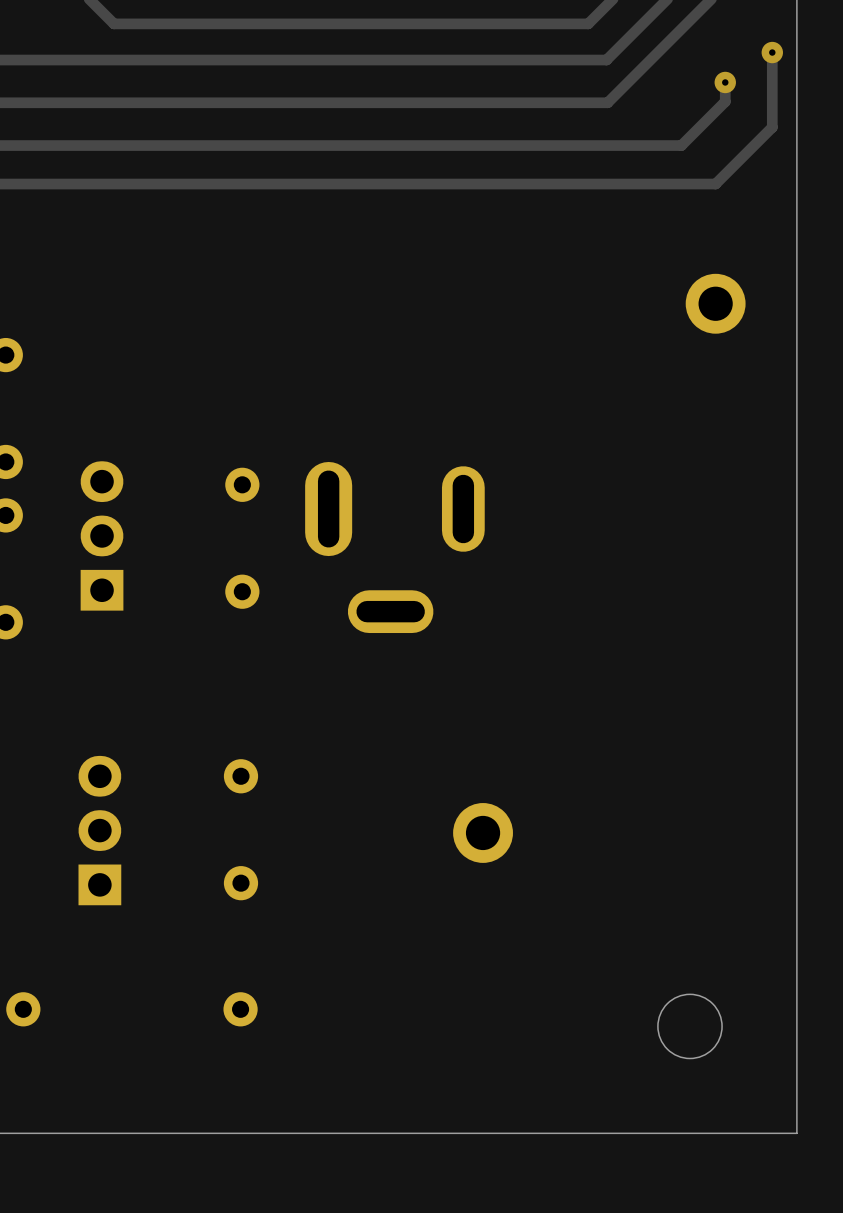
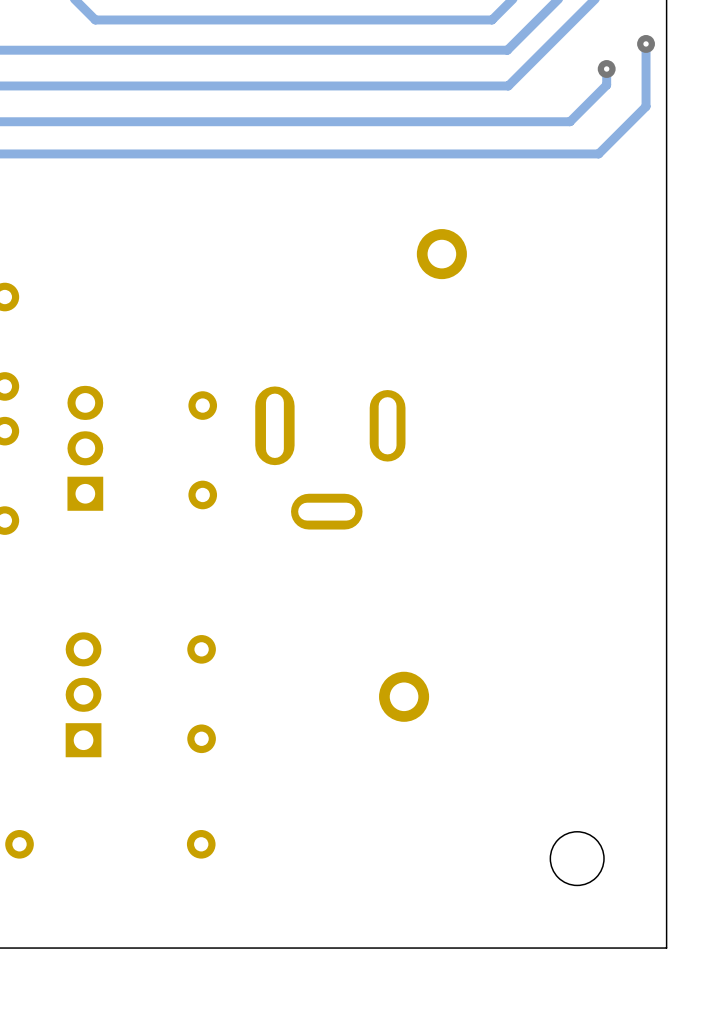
part position: (715, 303) -> (441, 254)

